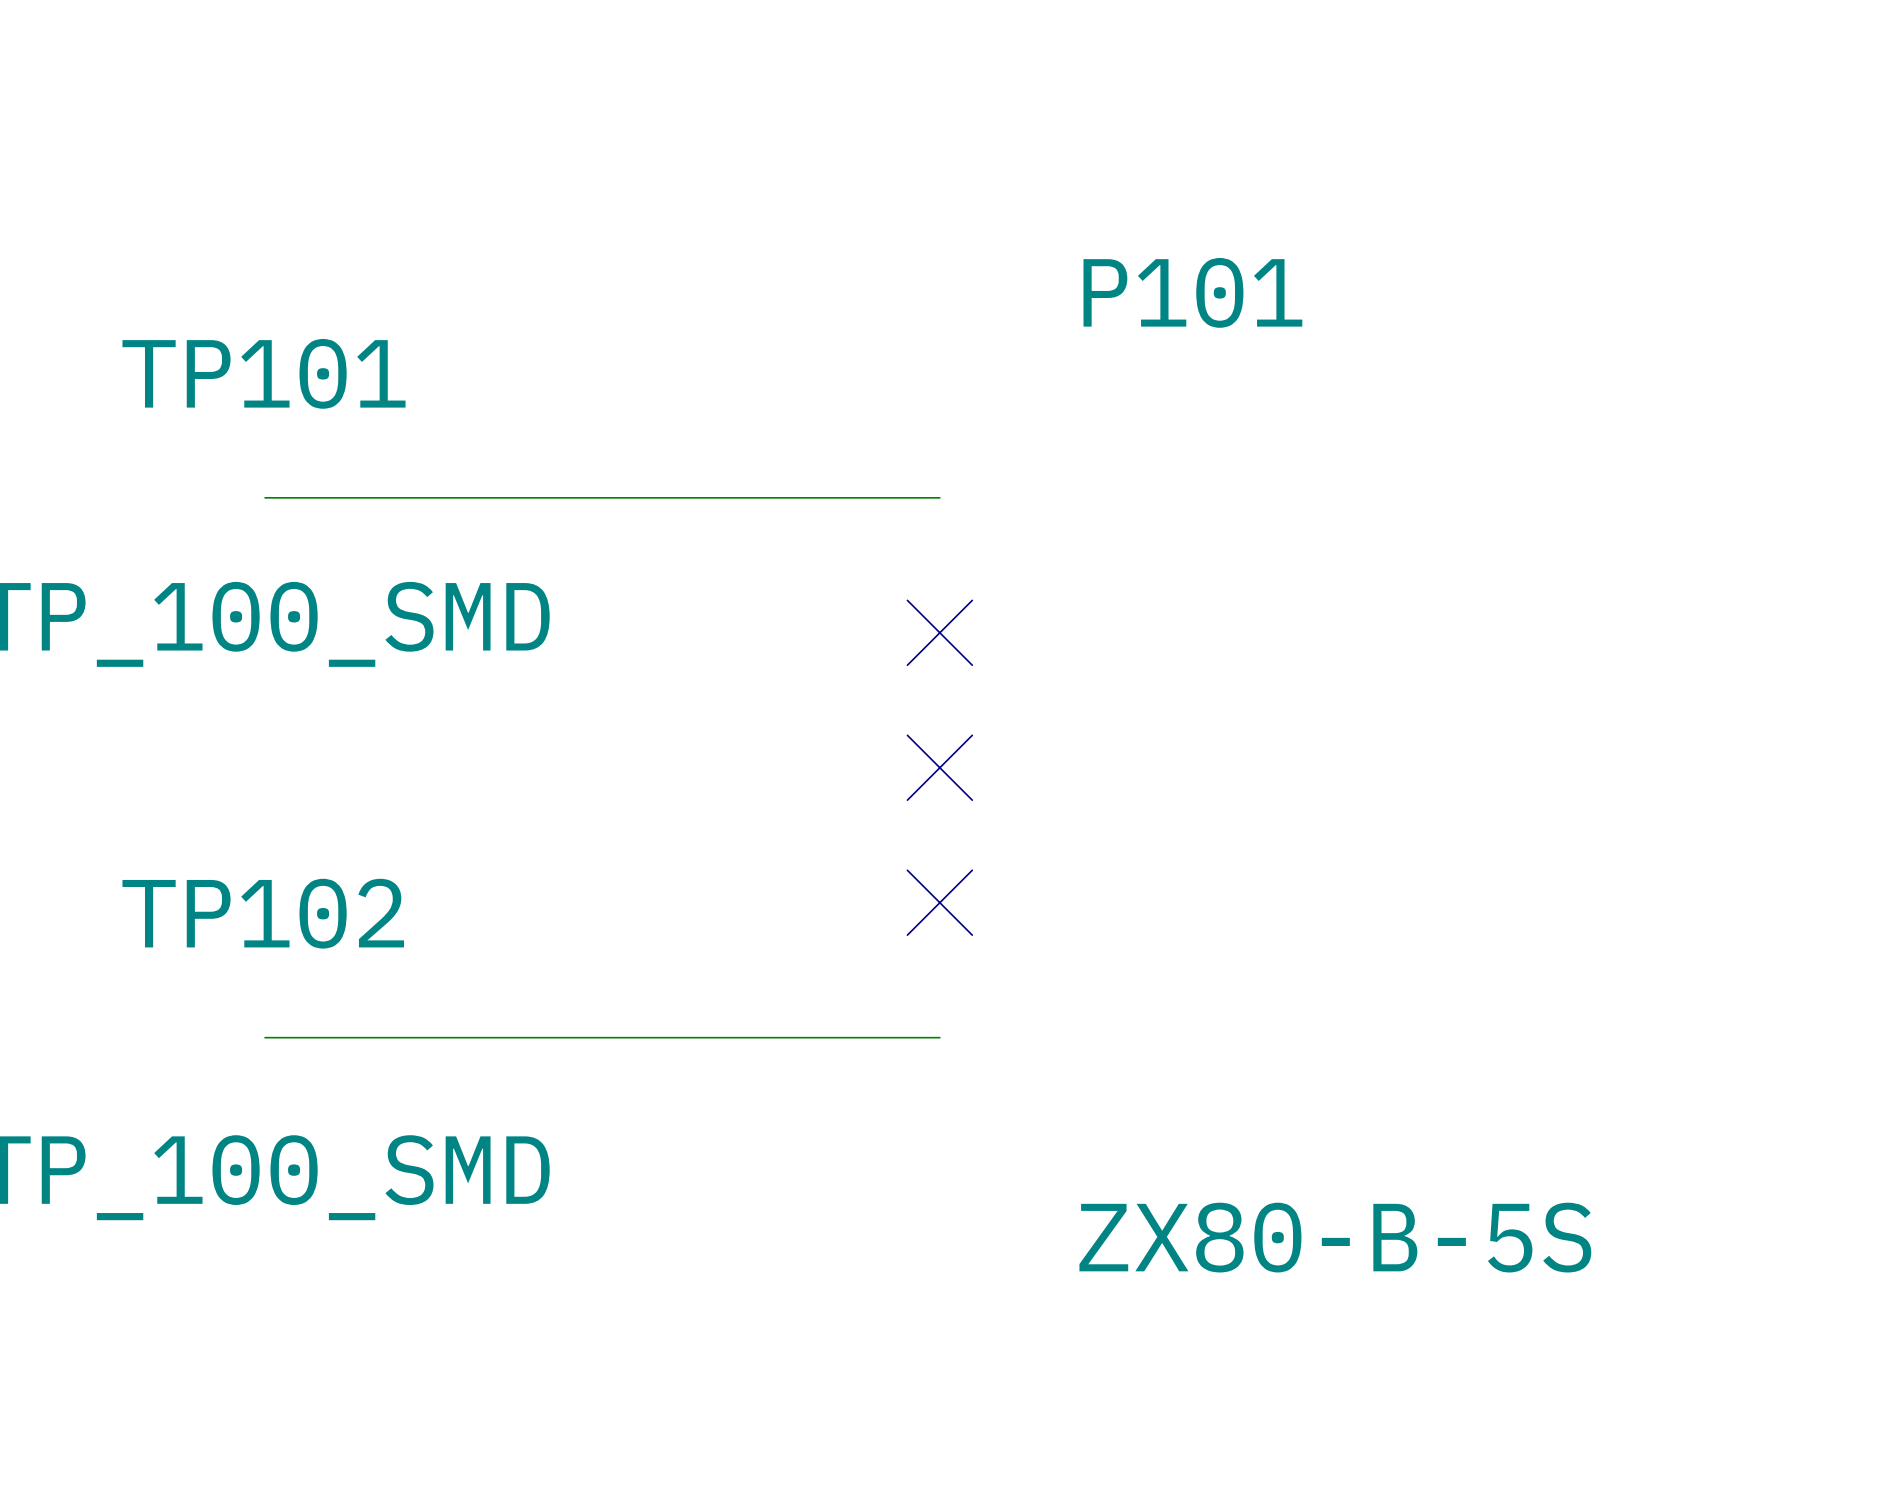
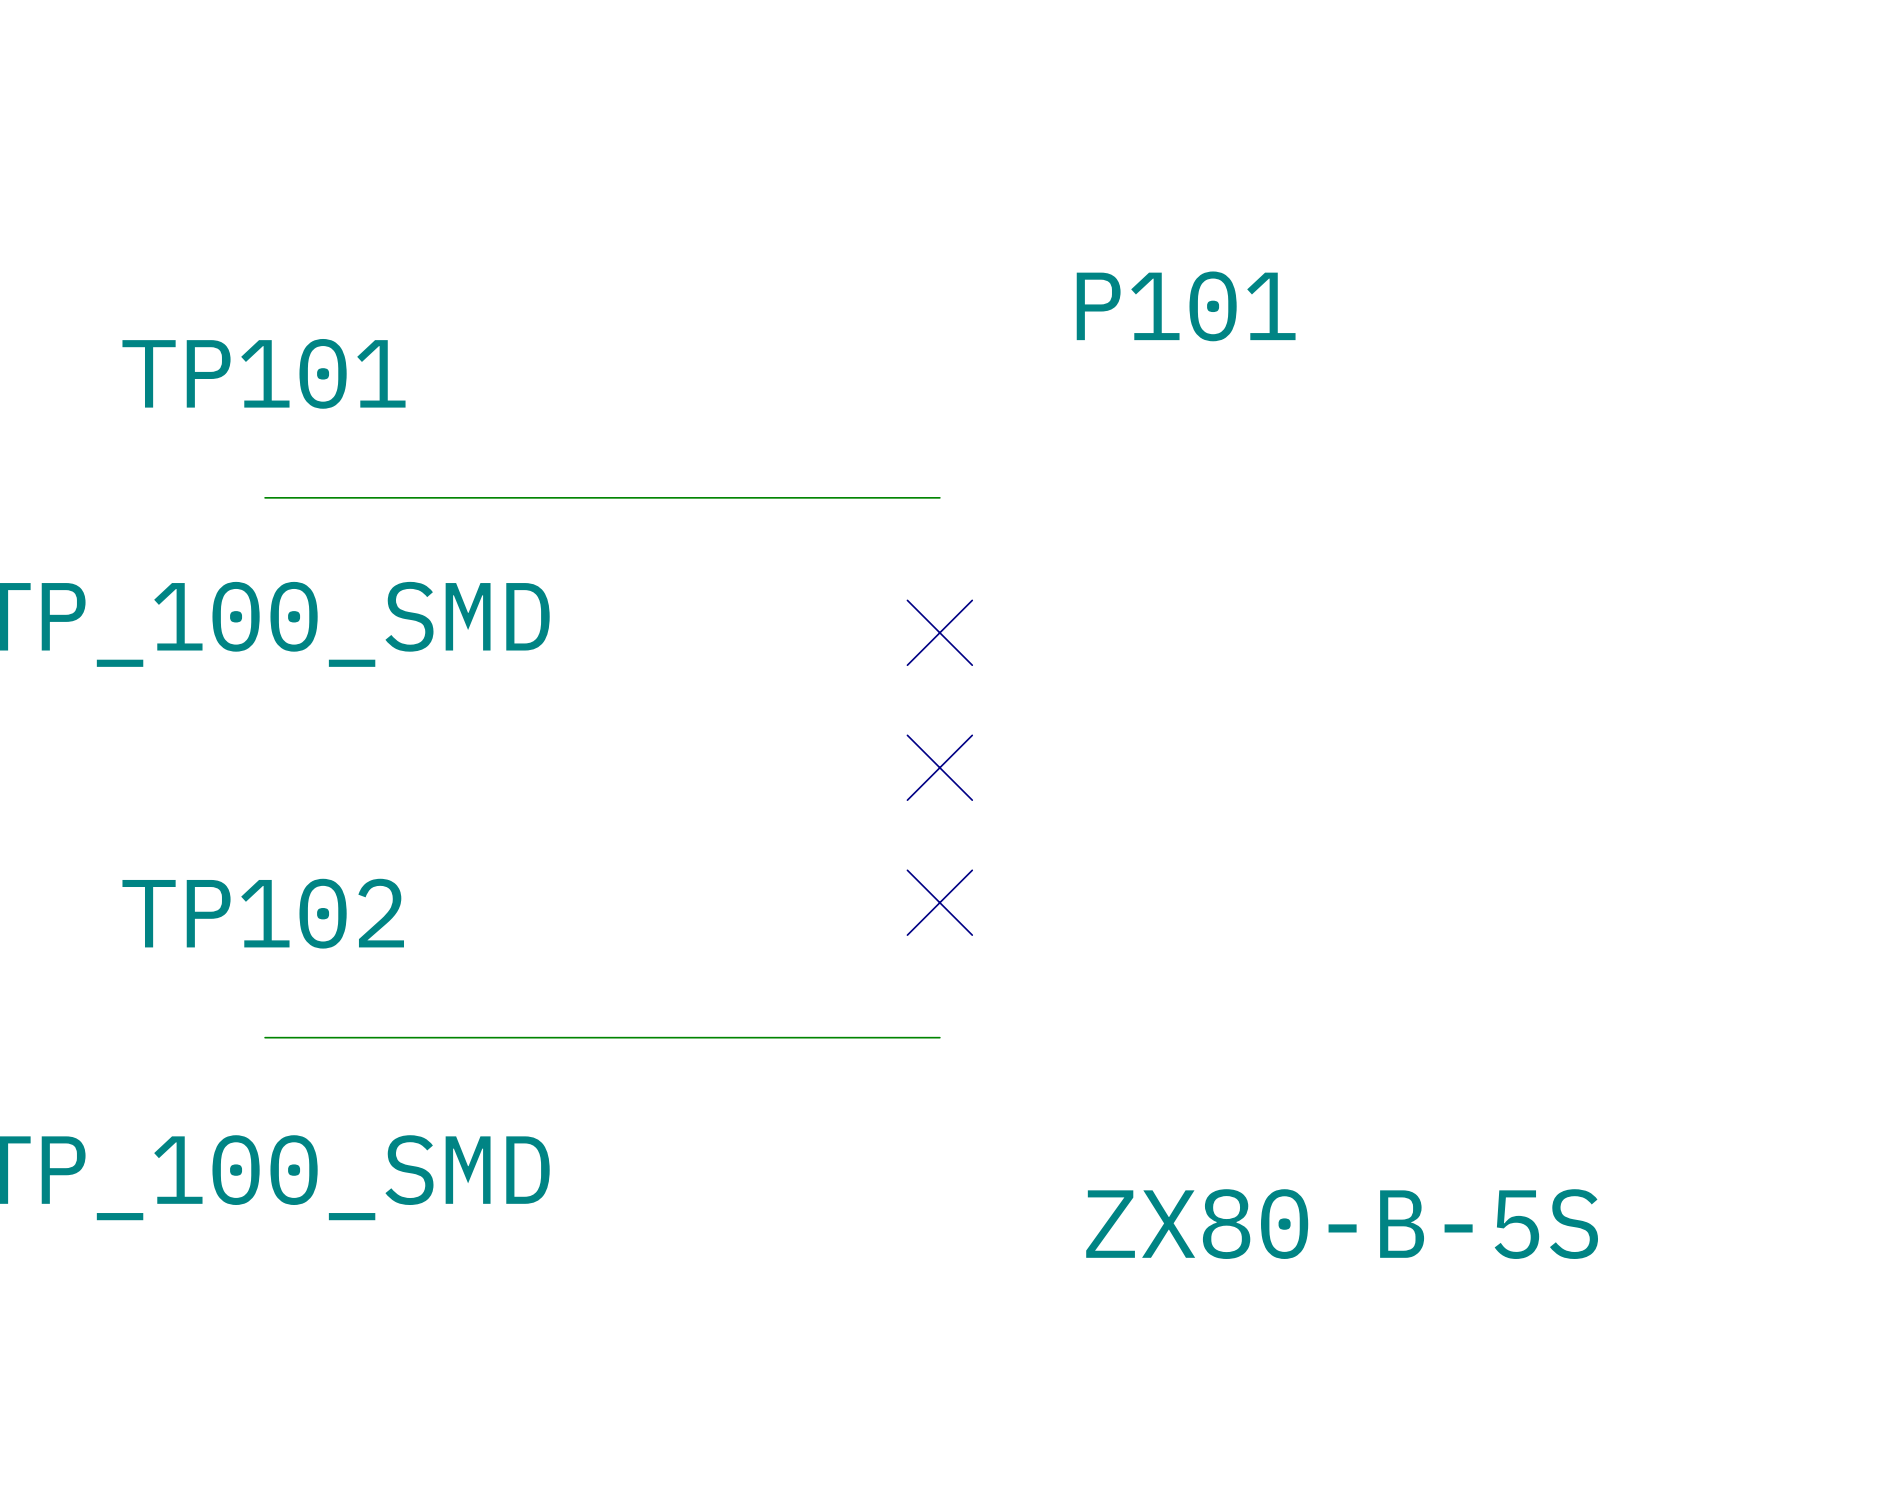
P101 name position: P101 (1192, 292) -> P101 (1186, 306)
P101 value position: ZX80-B-5S (1335, 1237) -> ZX80-B-5S (1342, 1224)

